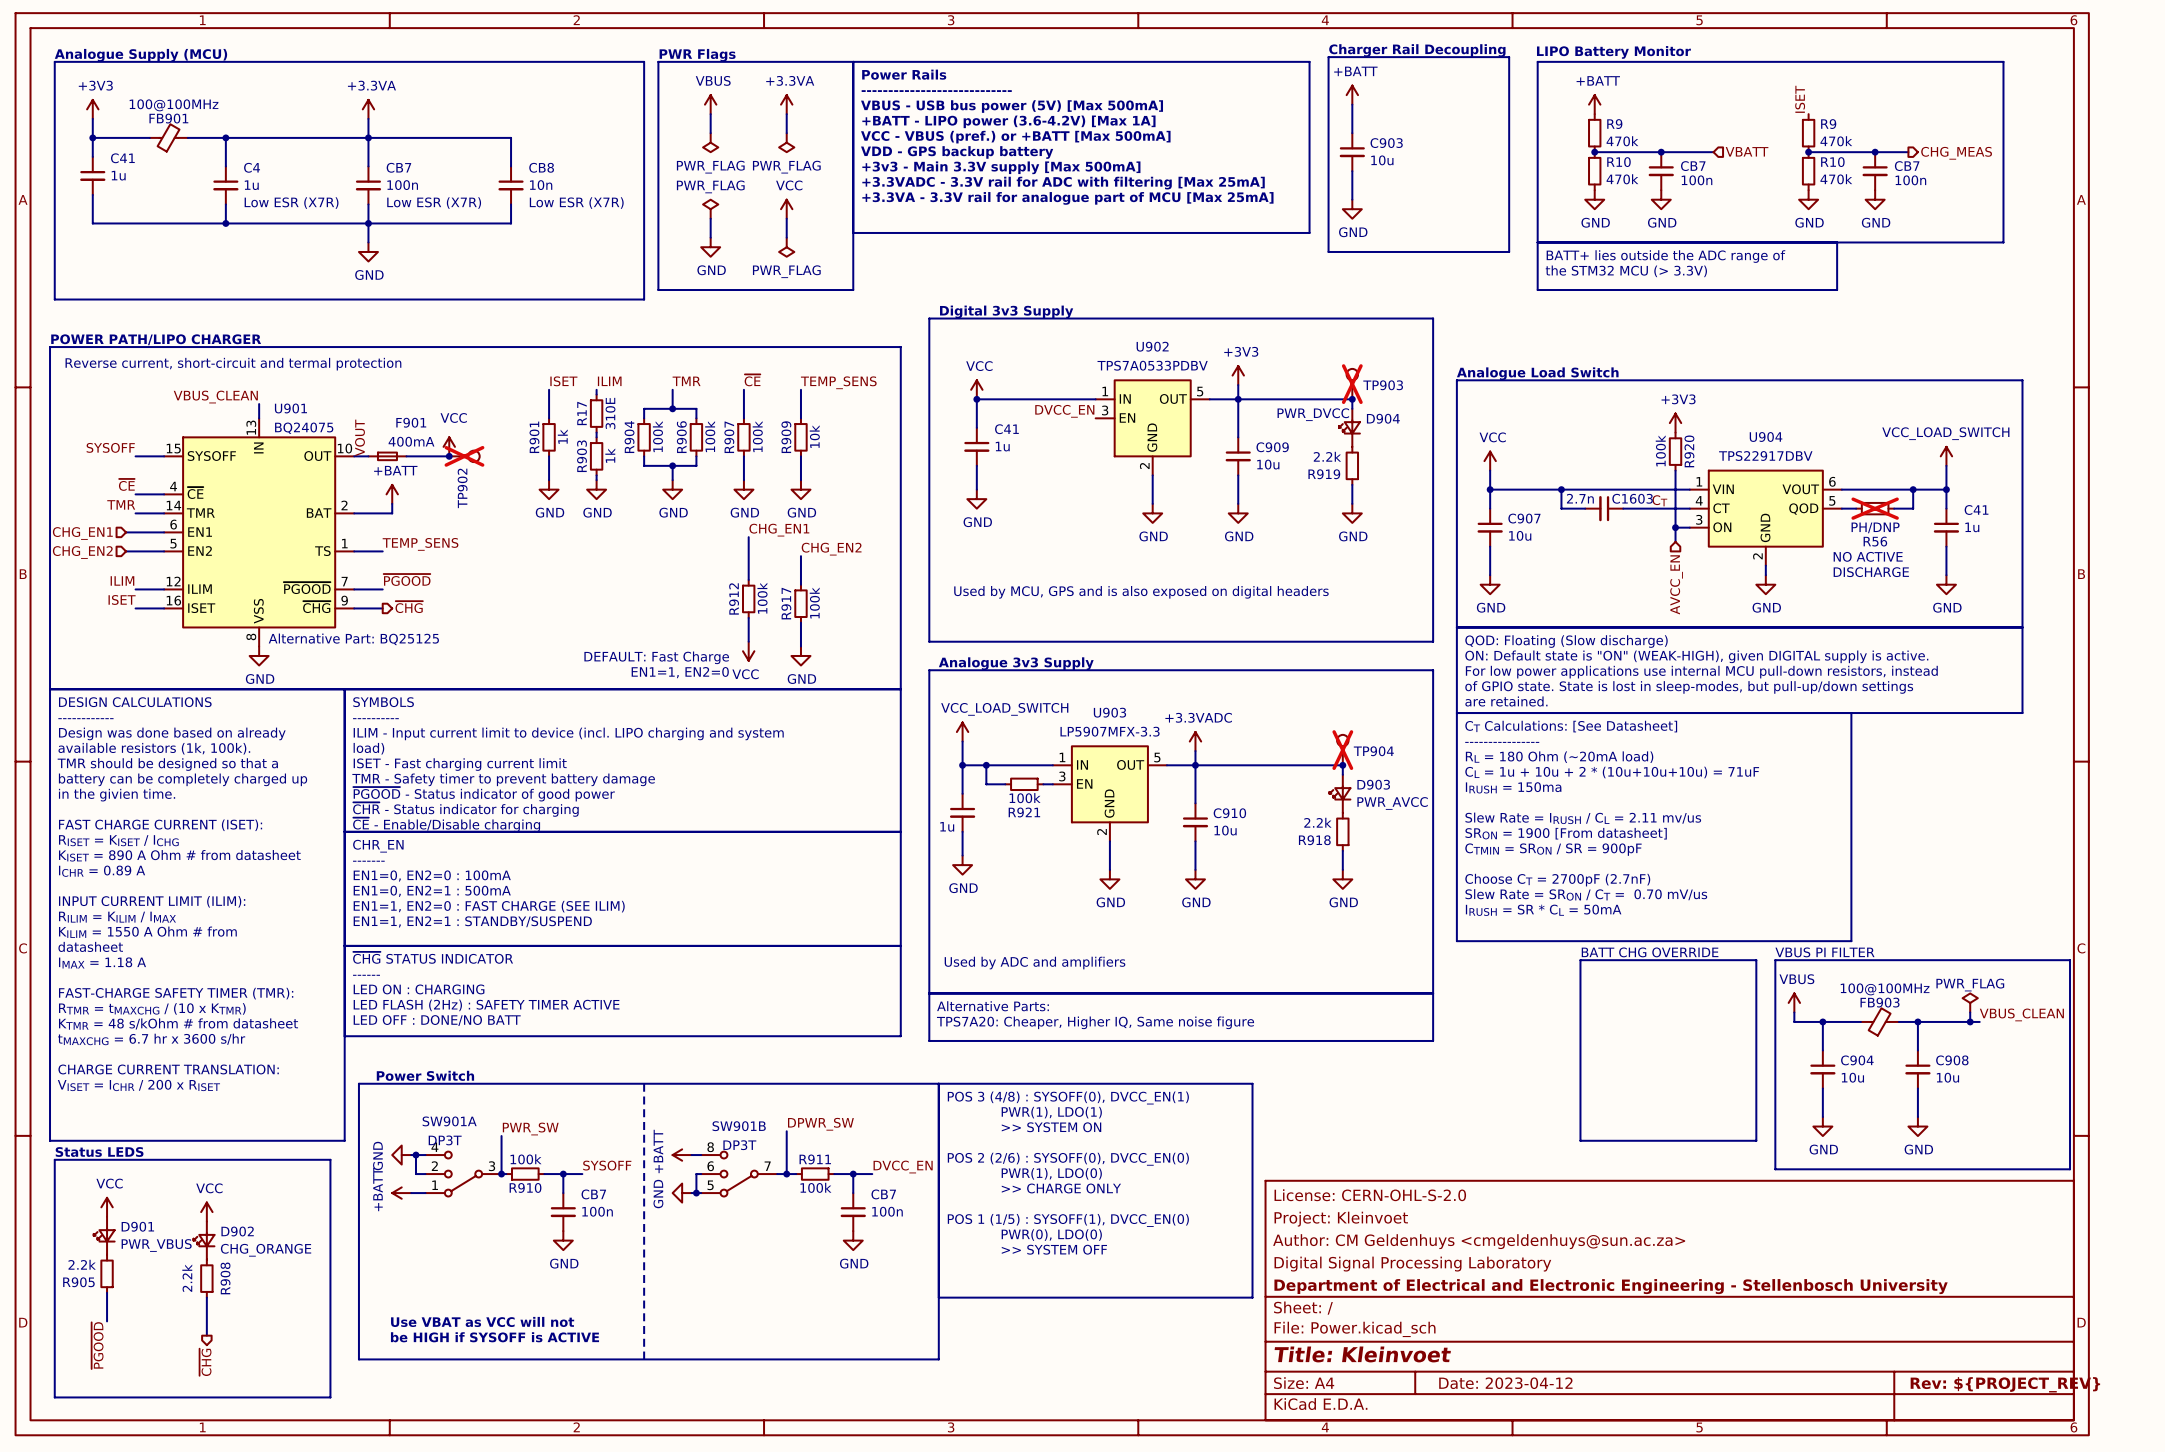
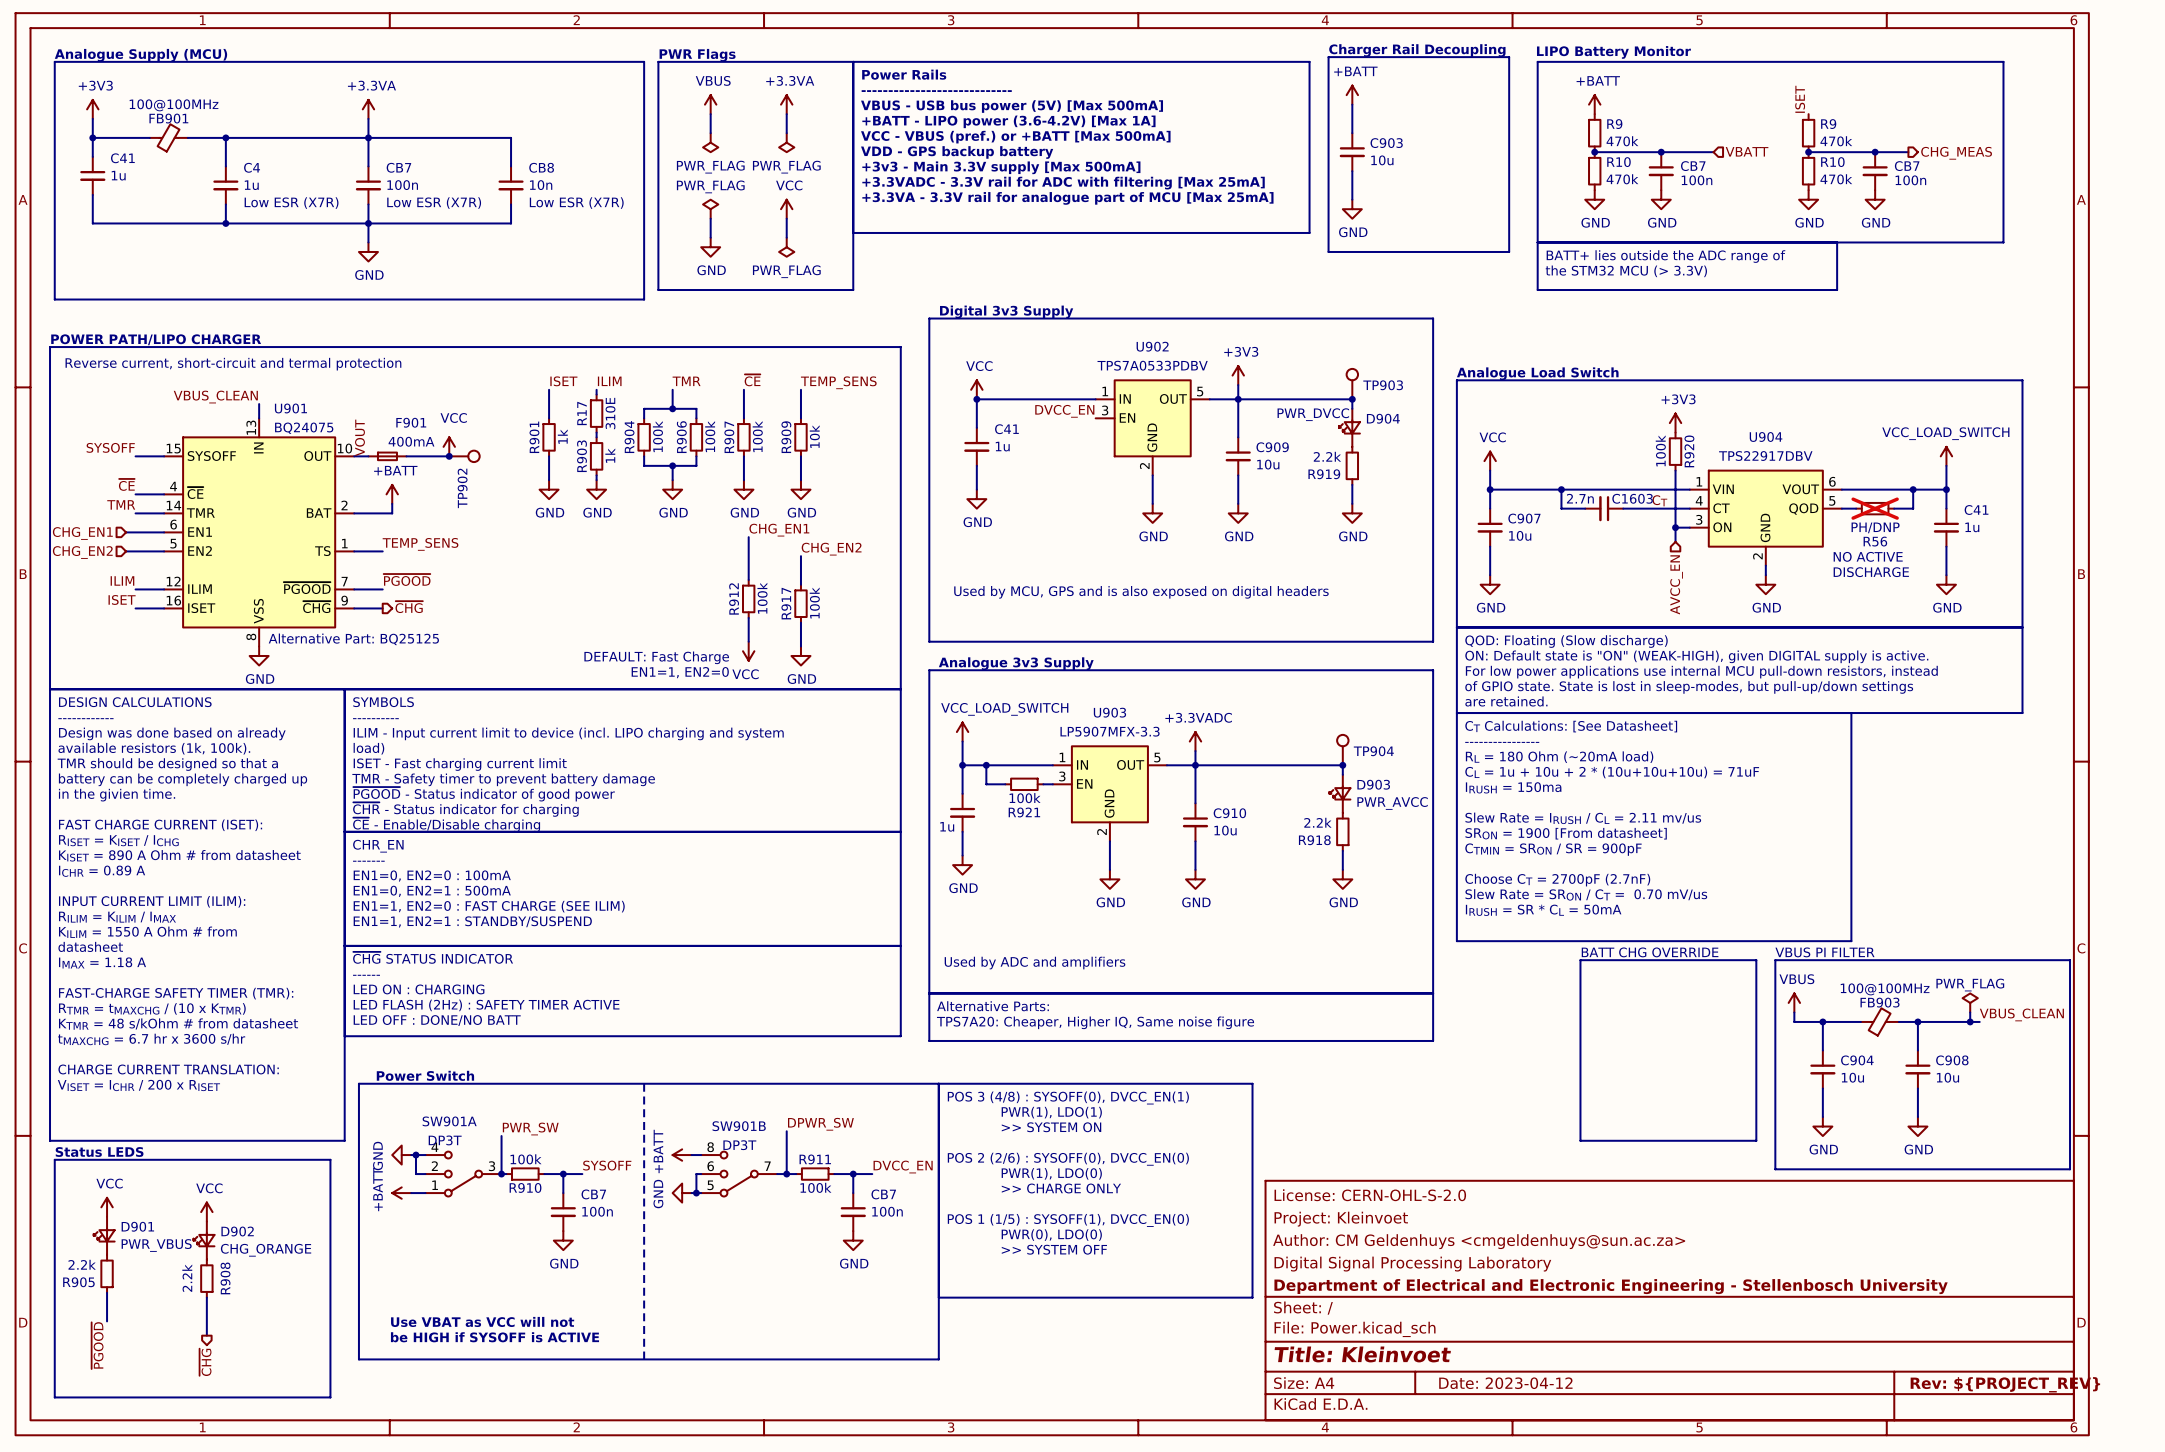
TP903 do-not-place cross: (1352, 384) -> none
TP902 do-not-place cross: (464, 456) -> none
TP904 do-not-place cross: (1342, 750) -> none

